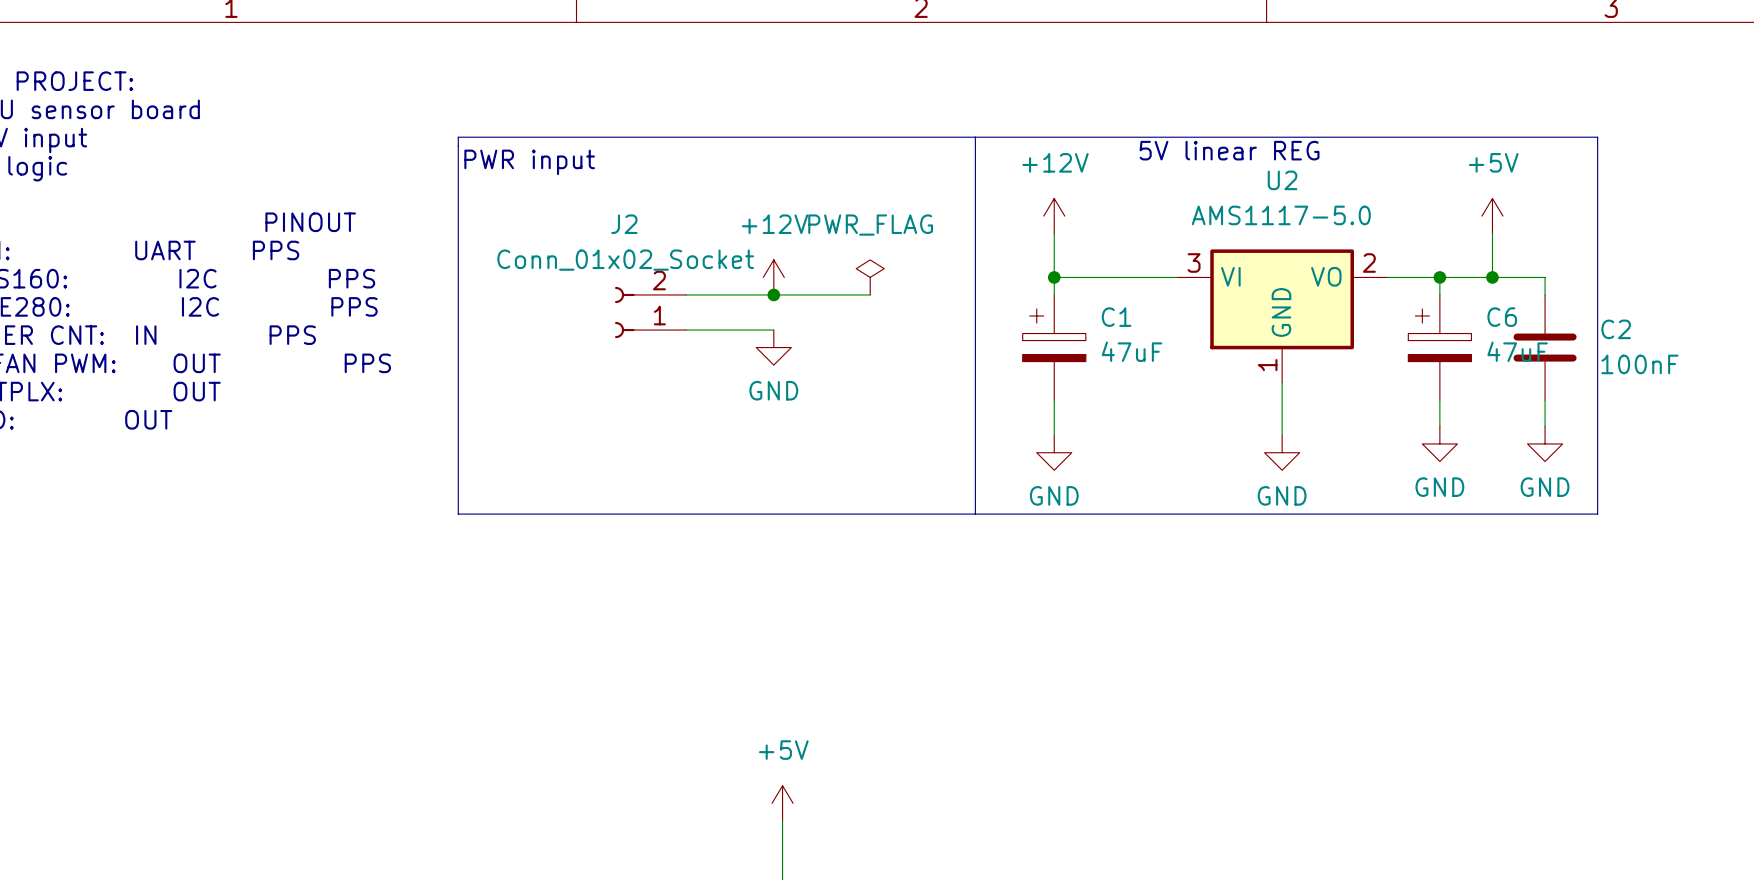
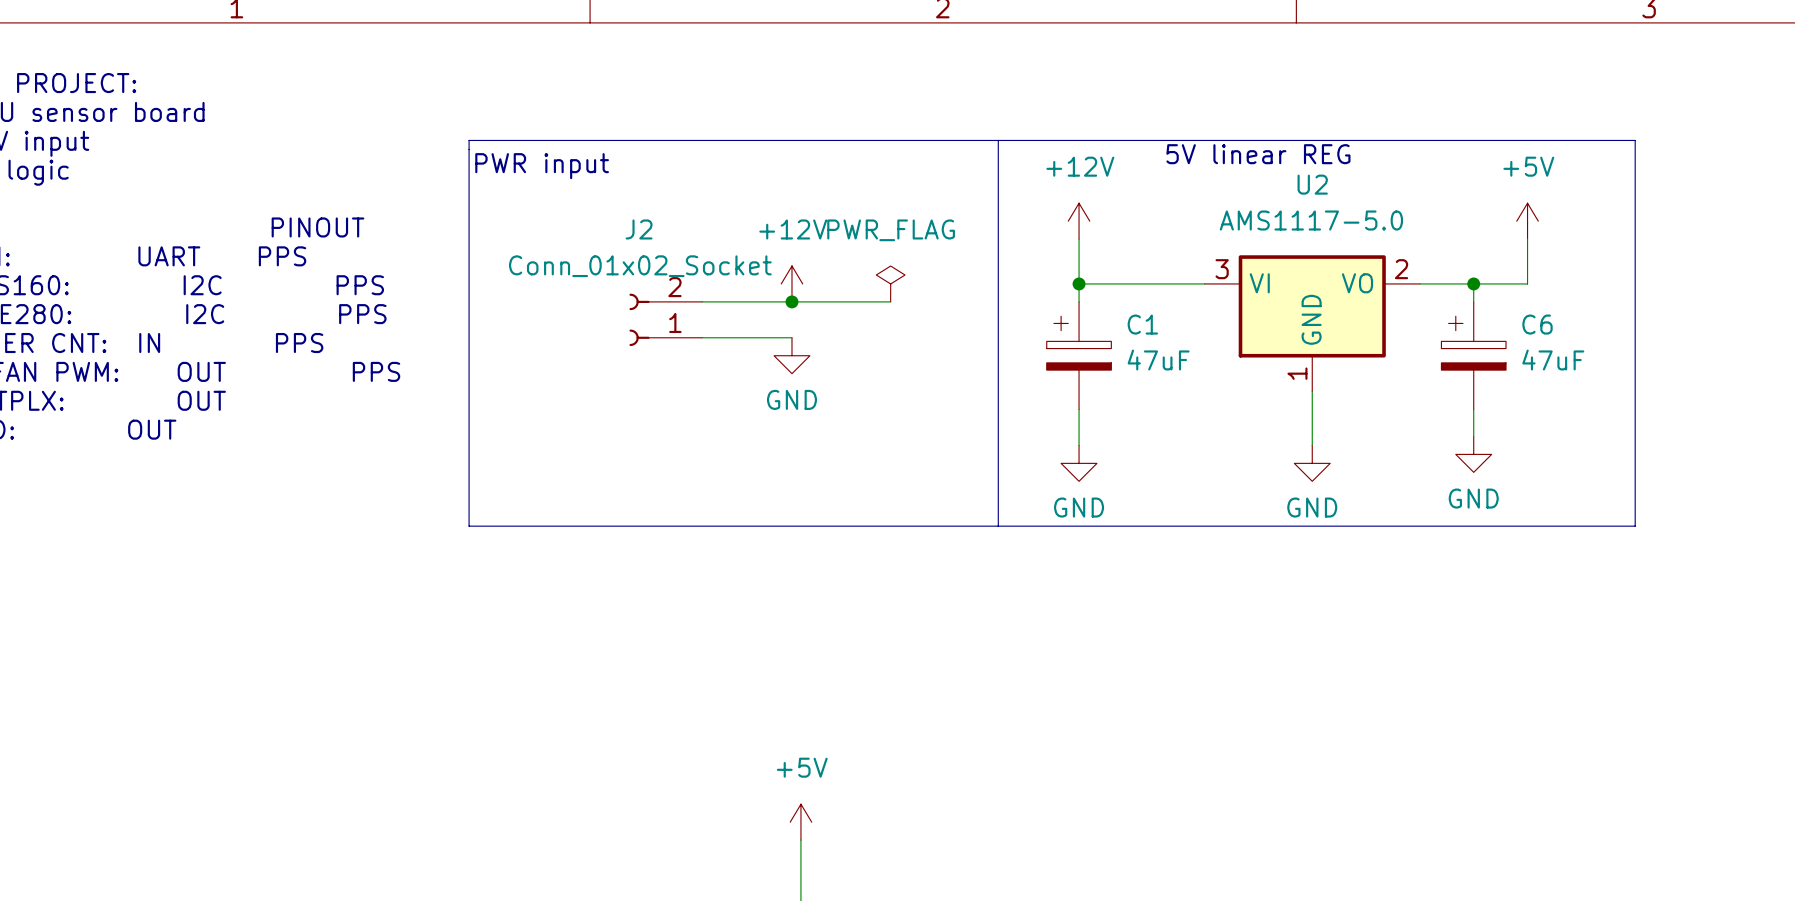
wire: (1492, 277) (1545, 277) (1545, 294) -> none
junction: (1492, 277) -> none
C2: 100nF (1545, 347) -> none
wire: (1545, 400) (1545, 426) -> none
power symbol: GND (1545, 443) -> none

